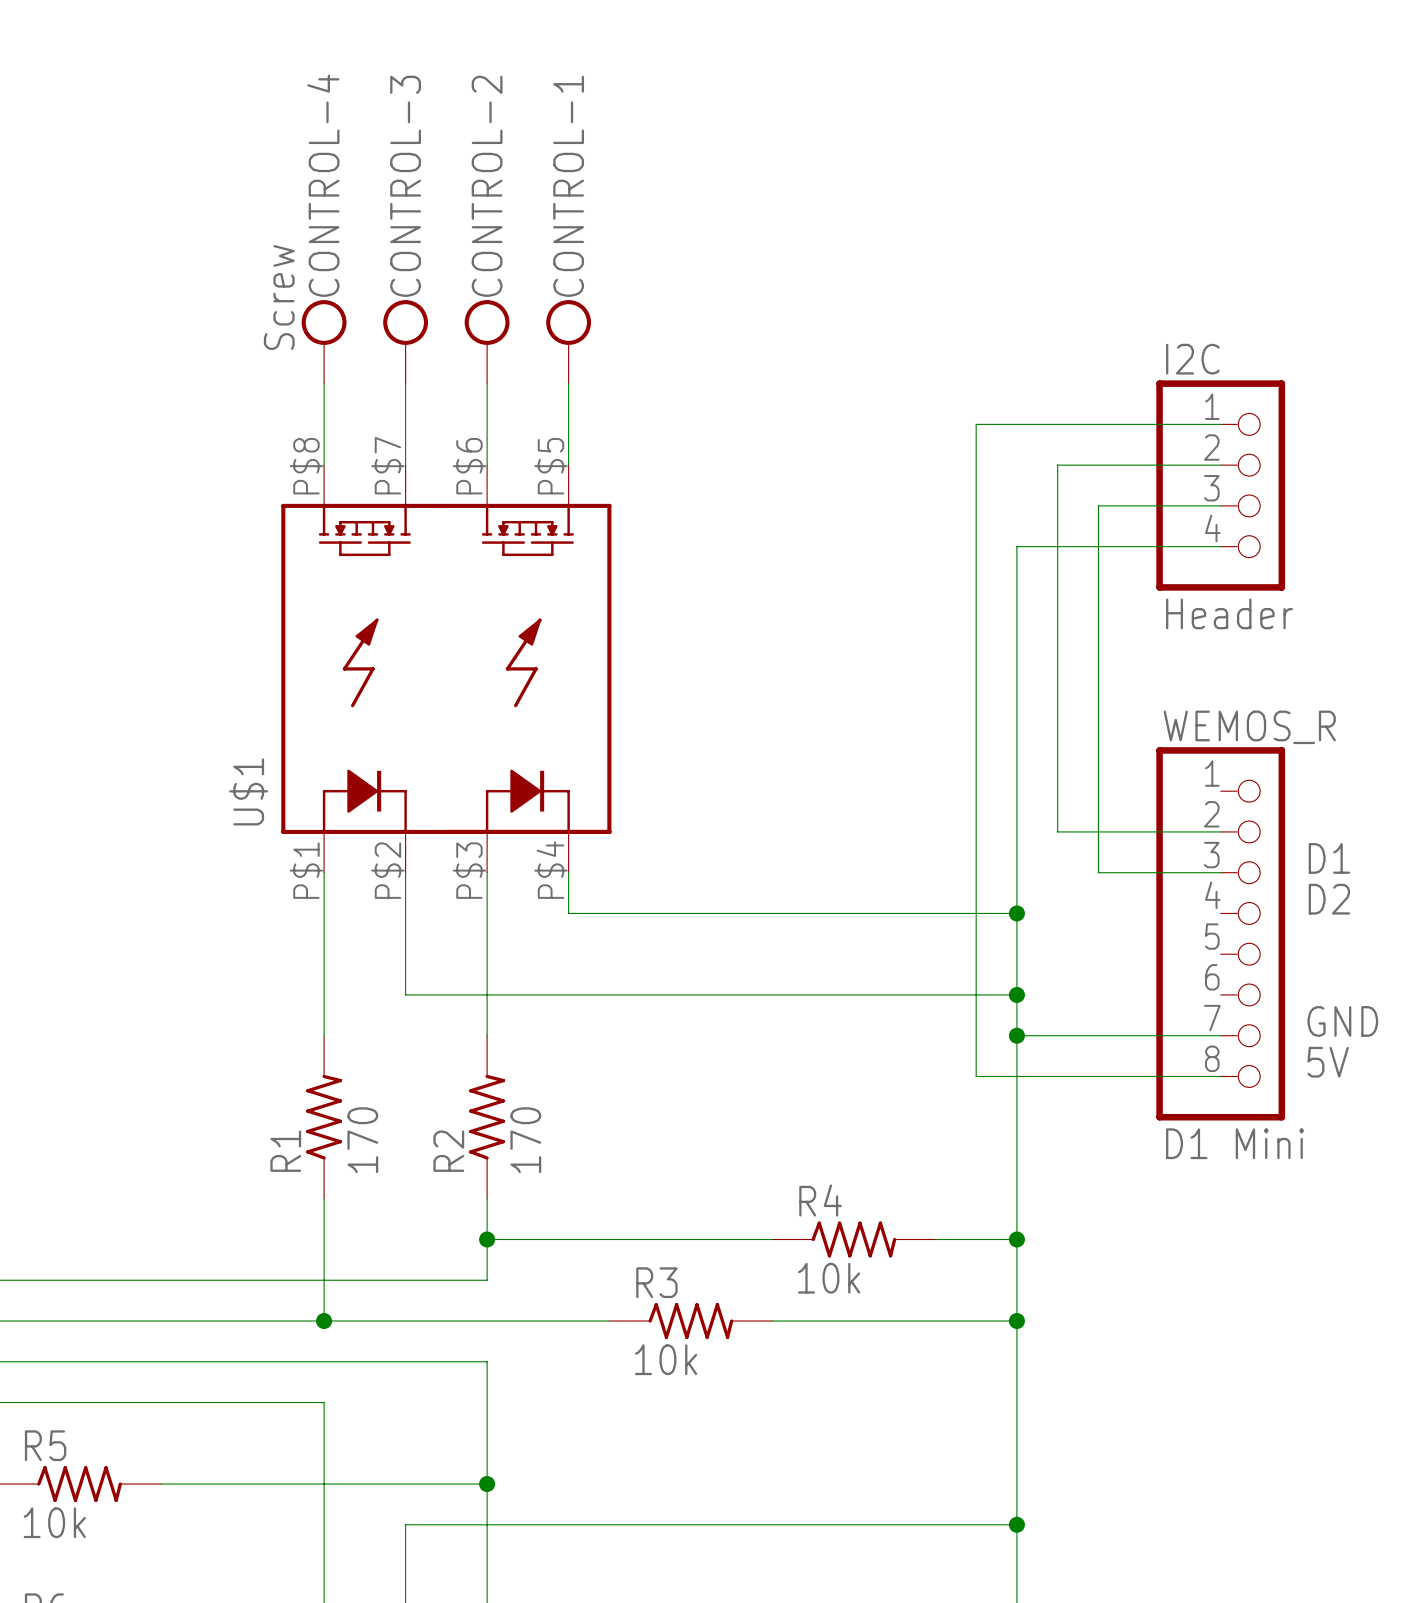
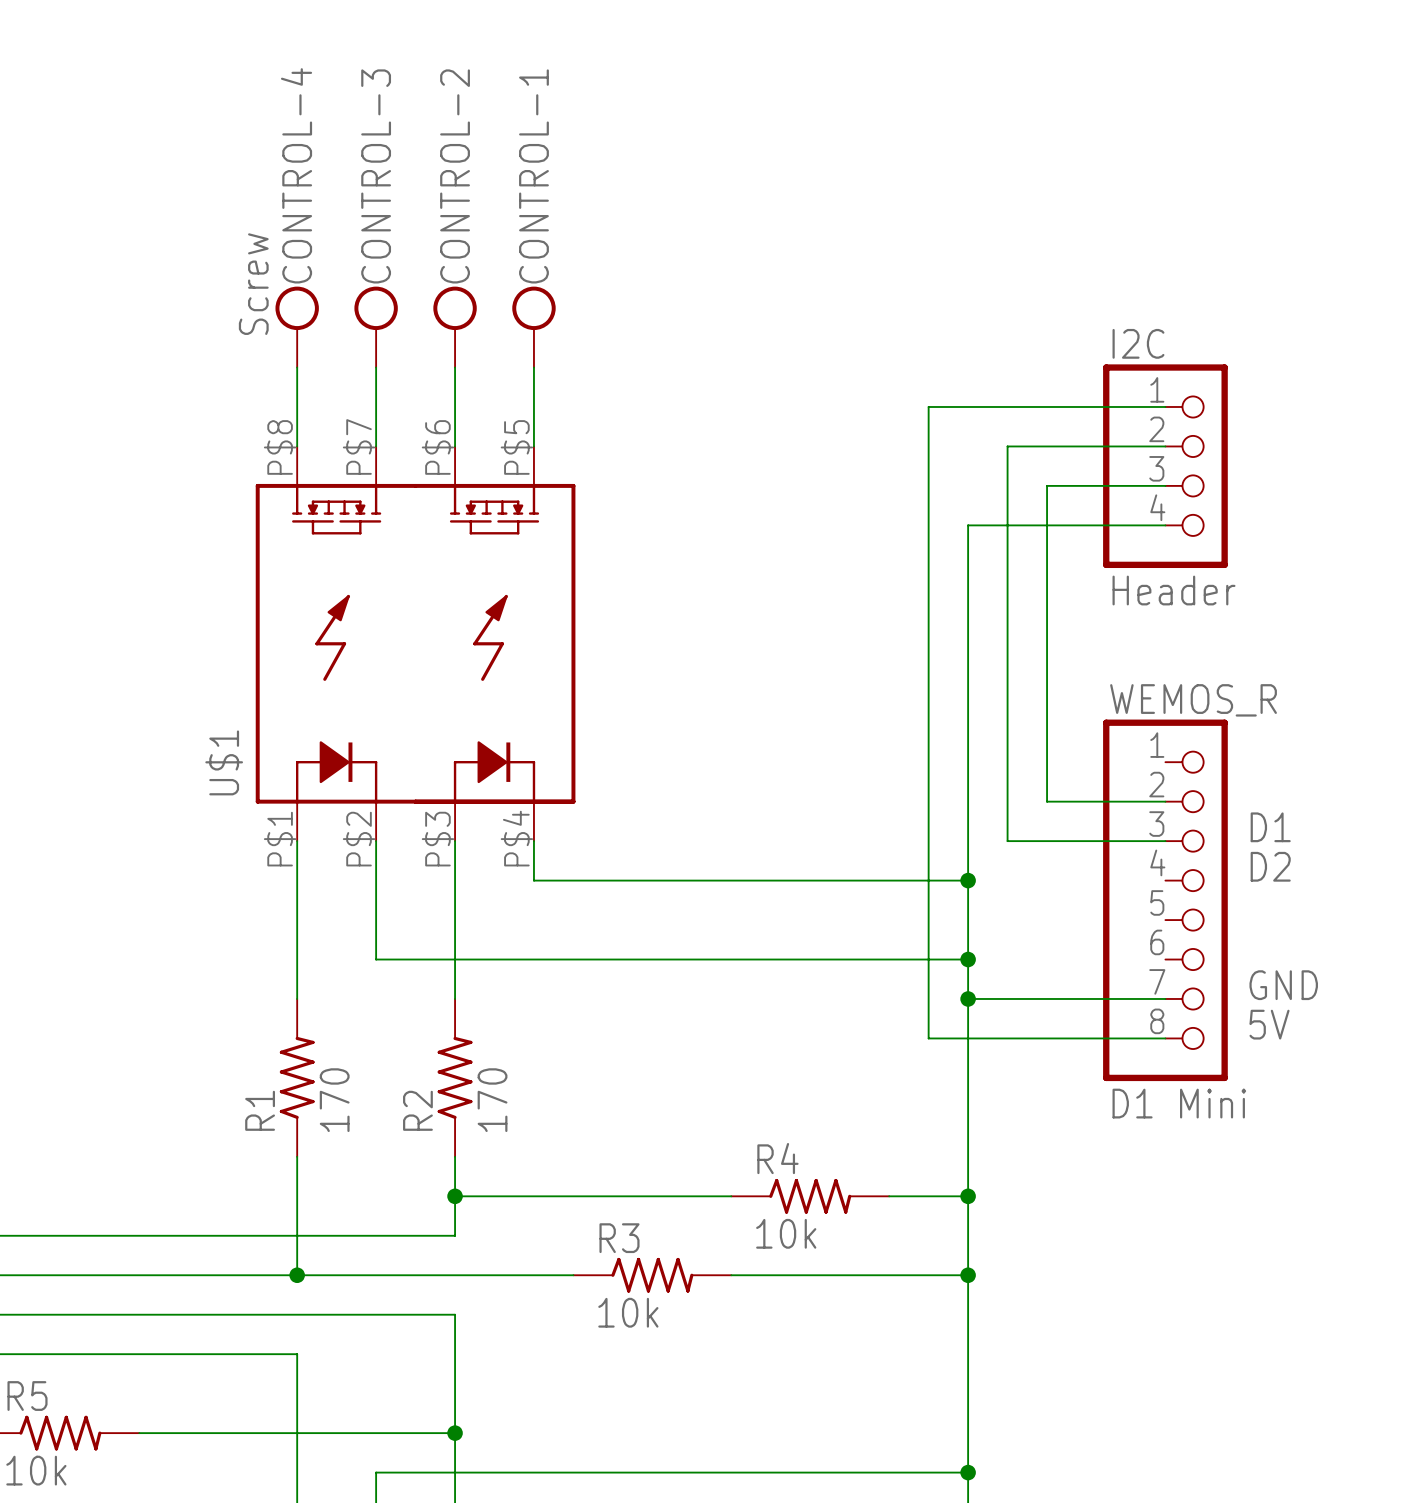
wire: (1057, 831) (1098, 831) (1098, 872) -> (1007, 801) (1007, 841) (1047, 841)

